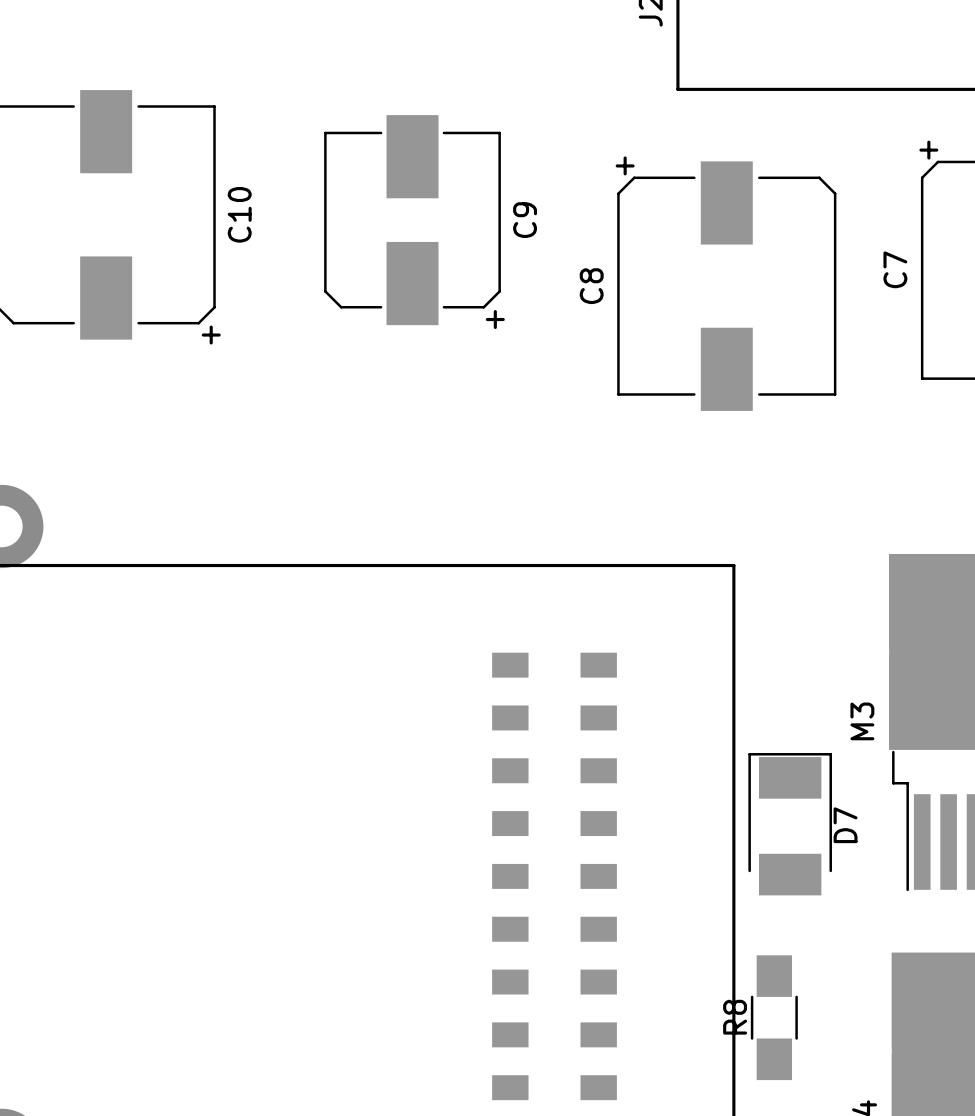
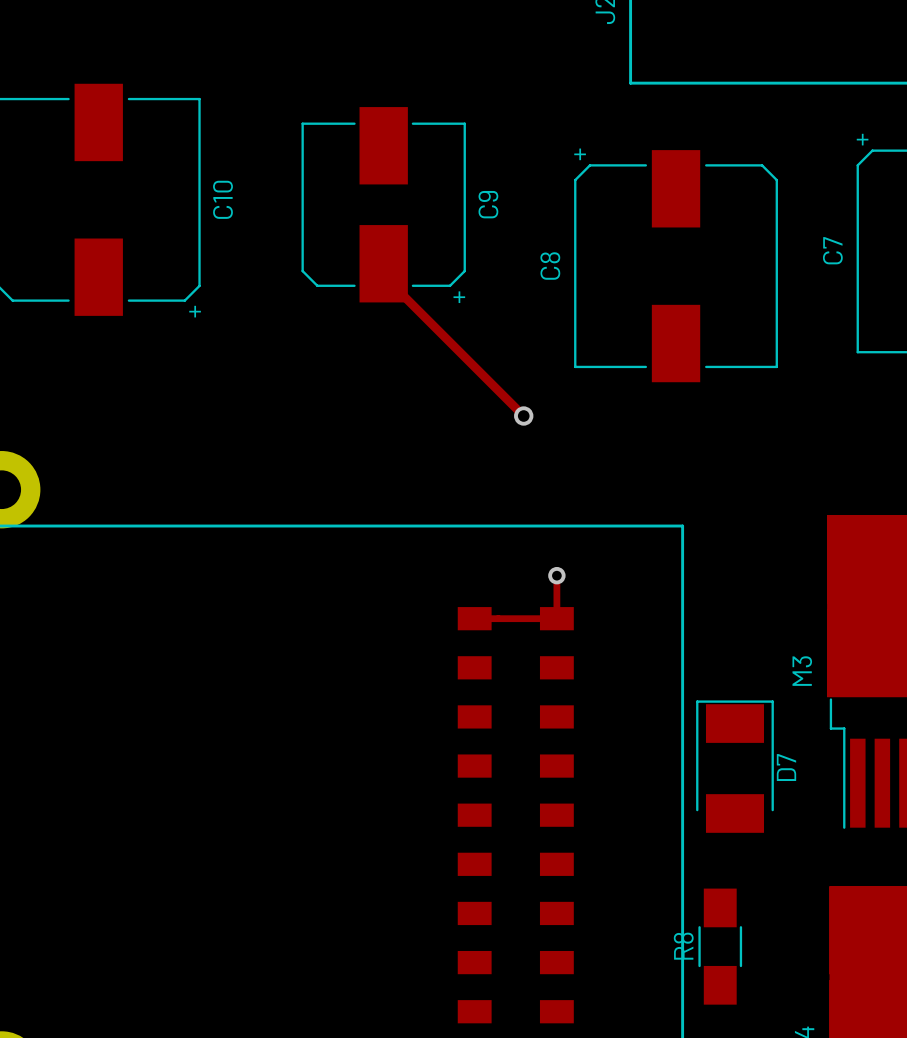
track: none -> (383, 263) (383, 275) (523, 416)
via: none -> (523, 416)
track: none -> (556, 575) (556, 618) (474, 618)
via: none -> (556, 575)

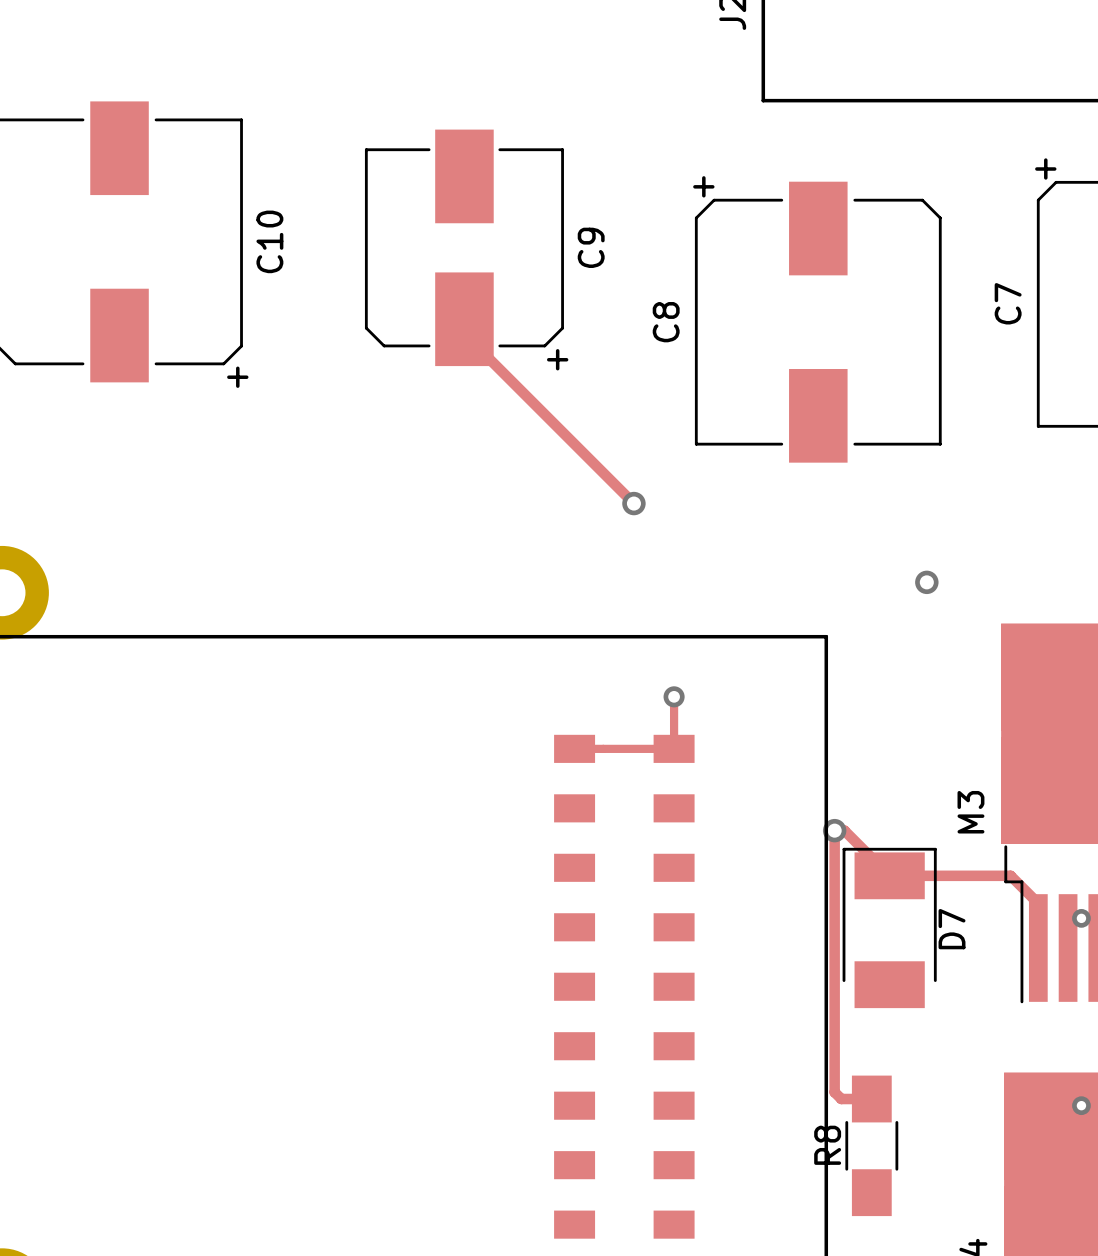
via: none -> (926, 582)
via: none -> (834, 830)
via: none -> (1081, 918)
track: none -> (1038, 948) (1038, 903) (1010, 875) (889, 875) (844, 830) (834, 830) (834, 1092) (841, 1099) (871, 1099)
via: none -> (1081, 1105)

